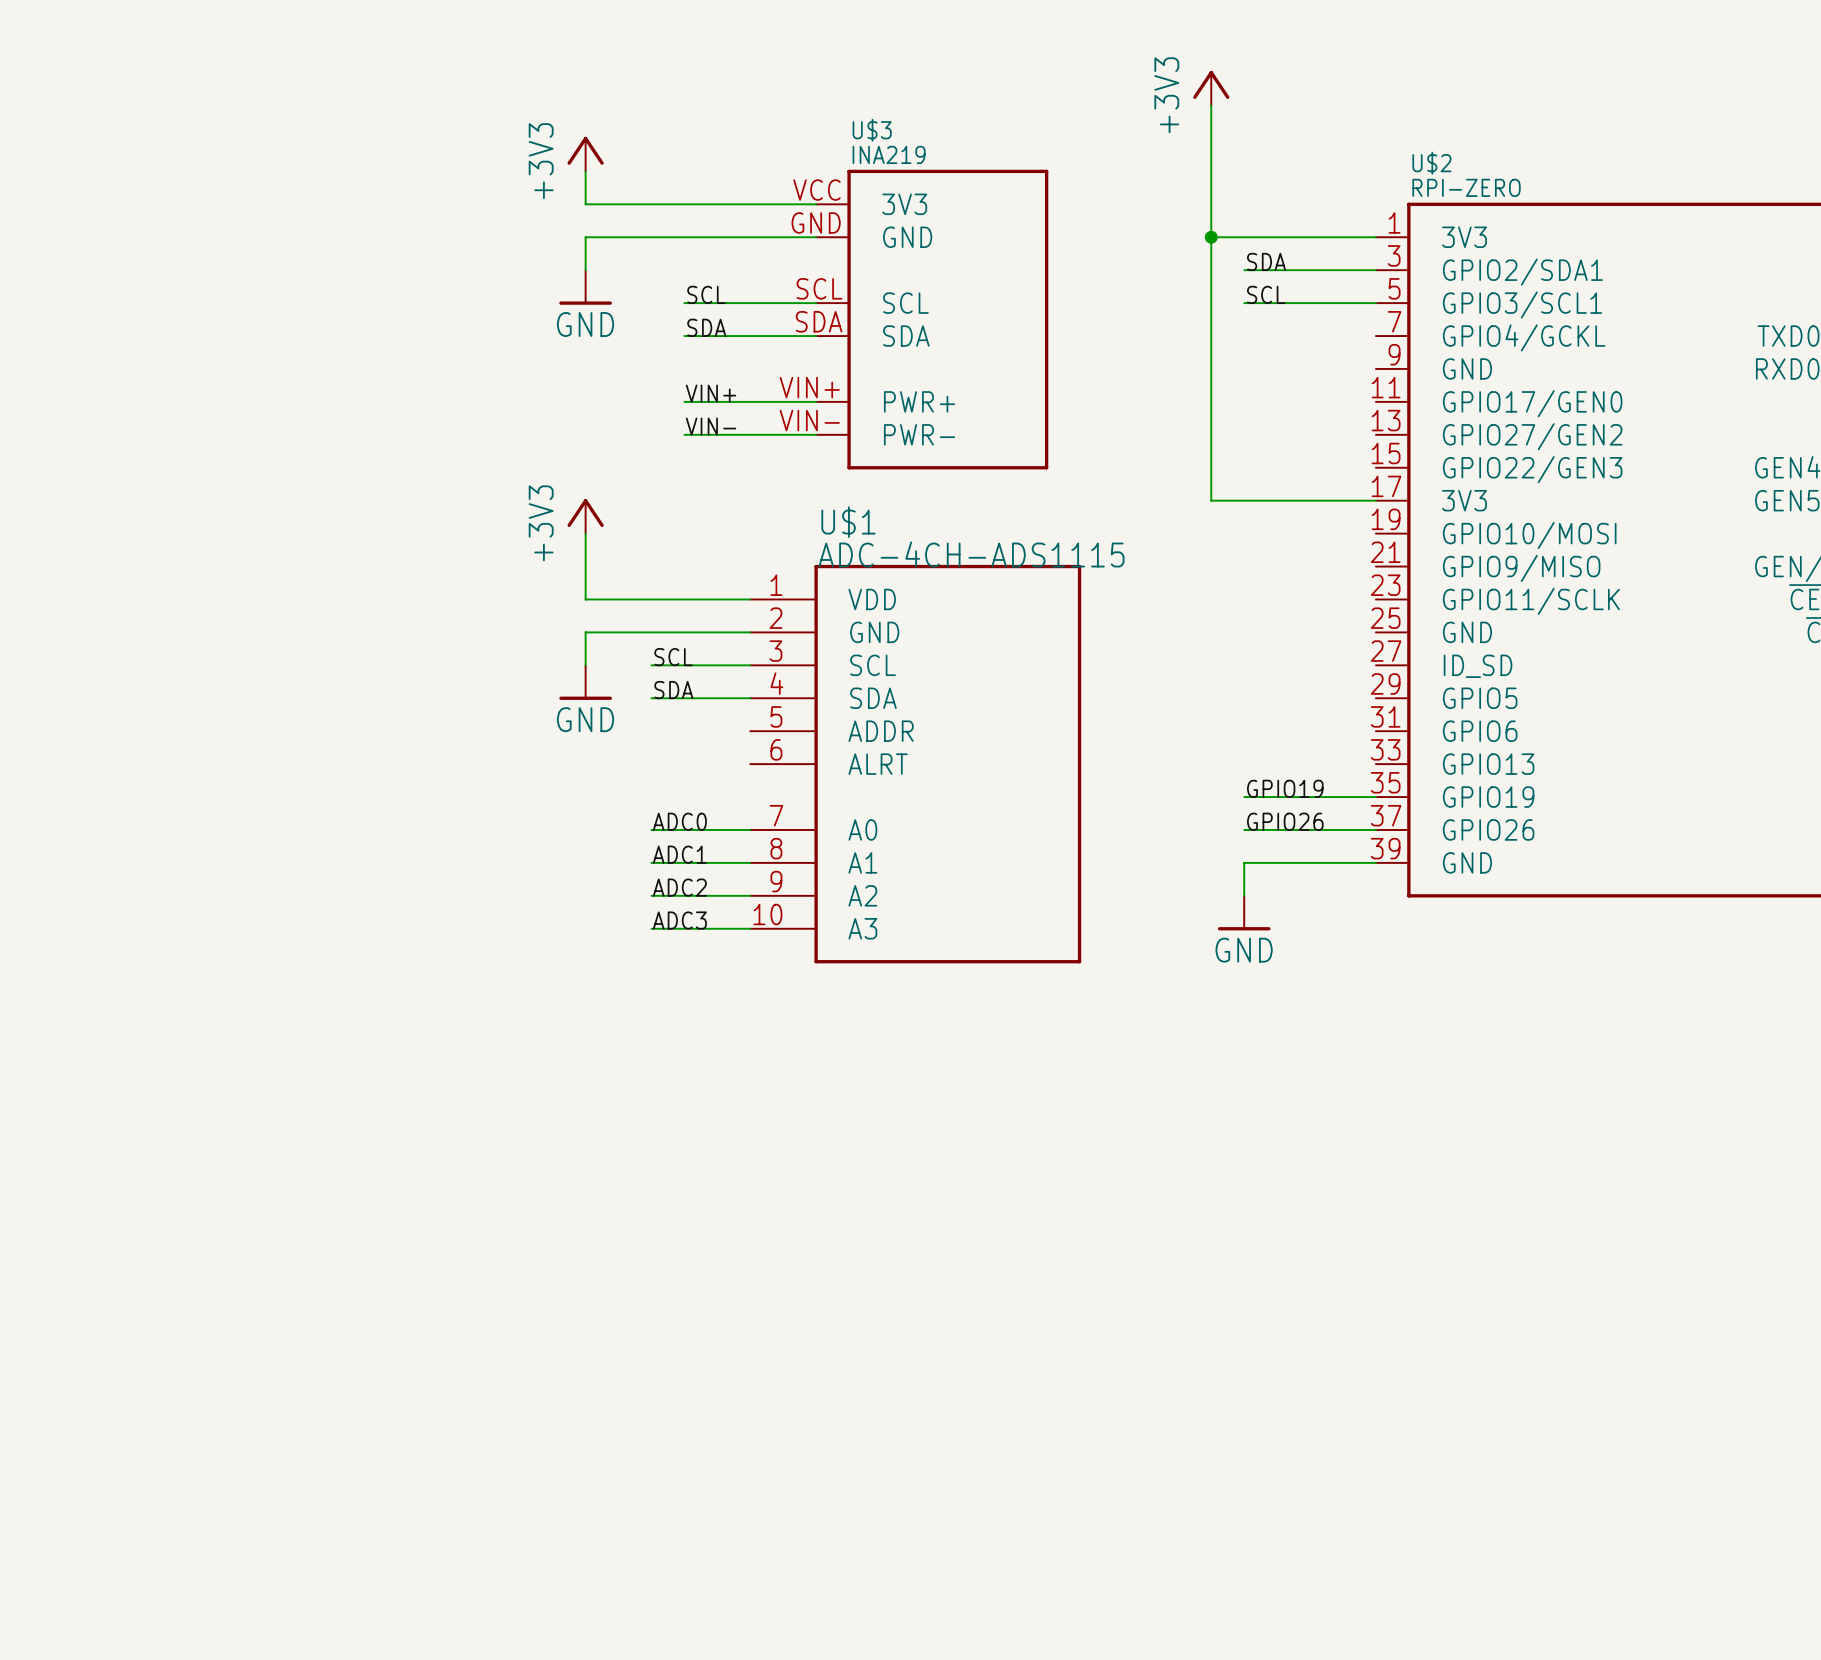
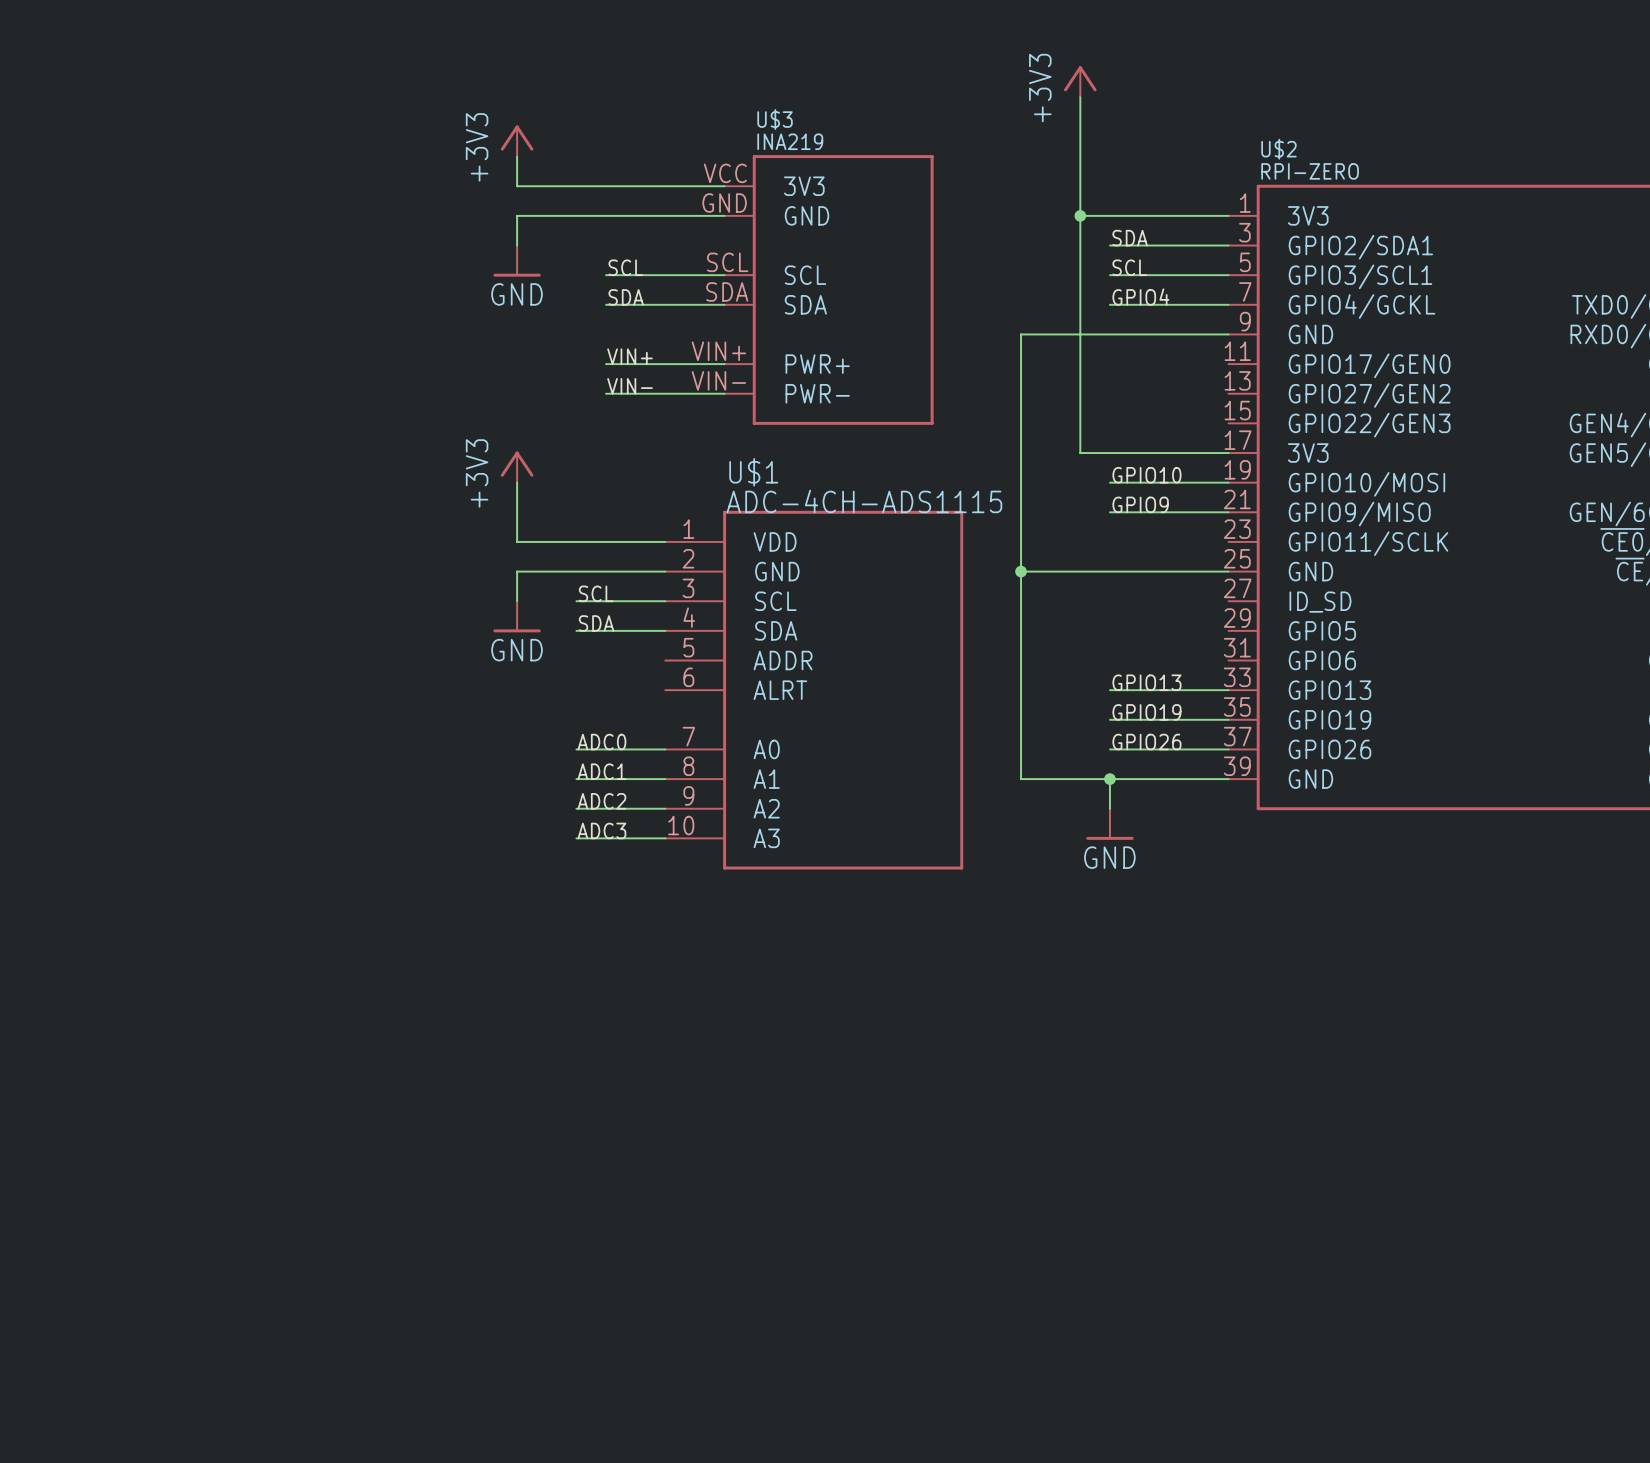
label: none -> GPIO4 (1140, 297)
wire: none -> (1109, 304) (1228, 304)
wire: none -> (1228, 334) (1021, 334) (1021, 779) (1109, 779)
label: none -> GPIO10 (1146, 475)
wire: none -> (1109, 482) (1228, 482)
label: none -> GPIO9 (1140, 504)
wire: none -> (1109, 512) (1228, 512)
wire: none -> (1021, 571) (1228, 571)
junction: none -> (1021, 571)
label: none -> GPIO13 (1146, 682)
wire: none -> (1109, 690) (1228, 690)
junction: none -> (1109, 779)

